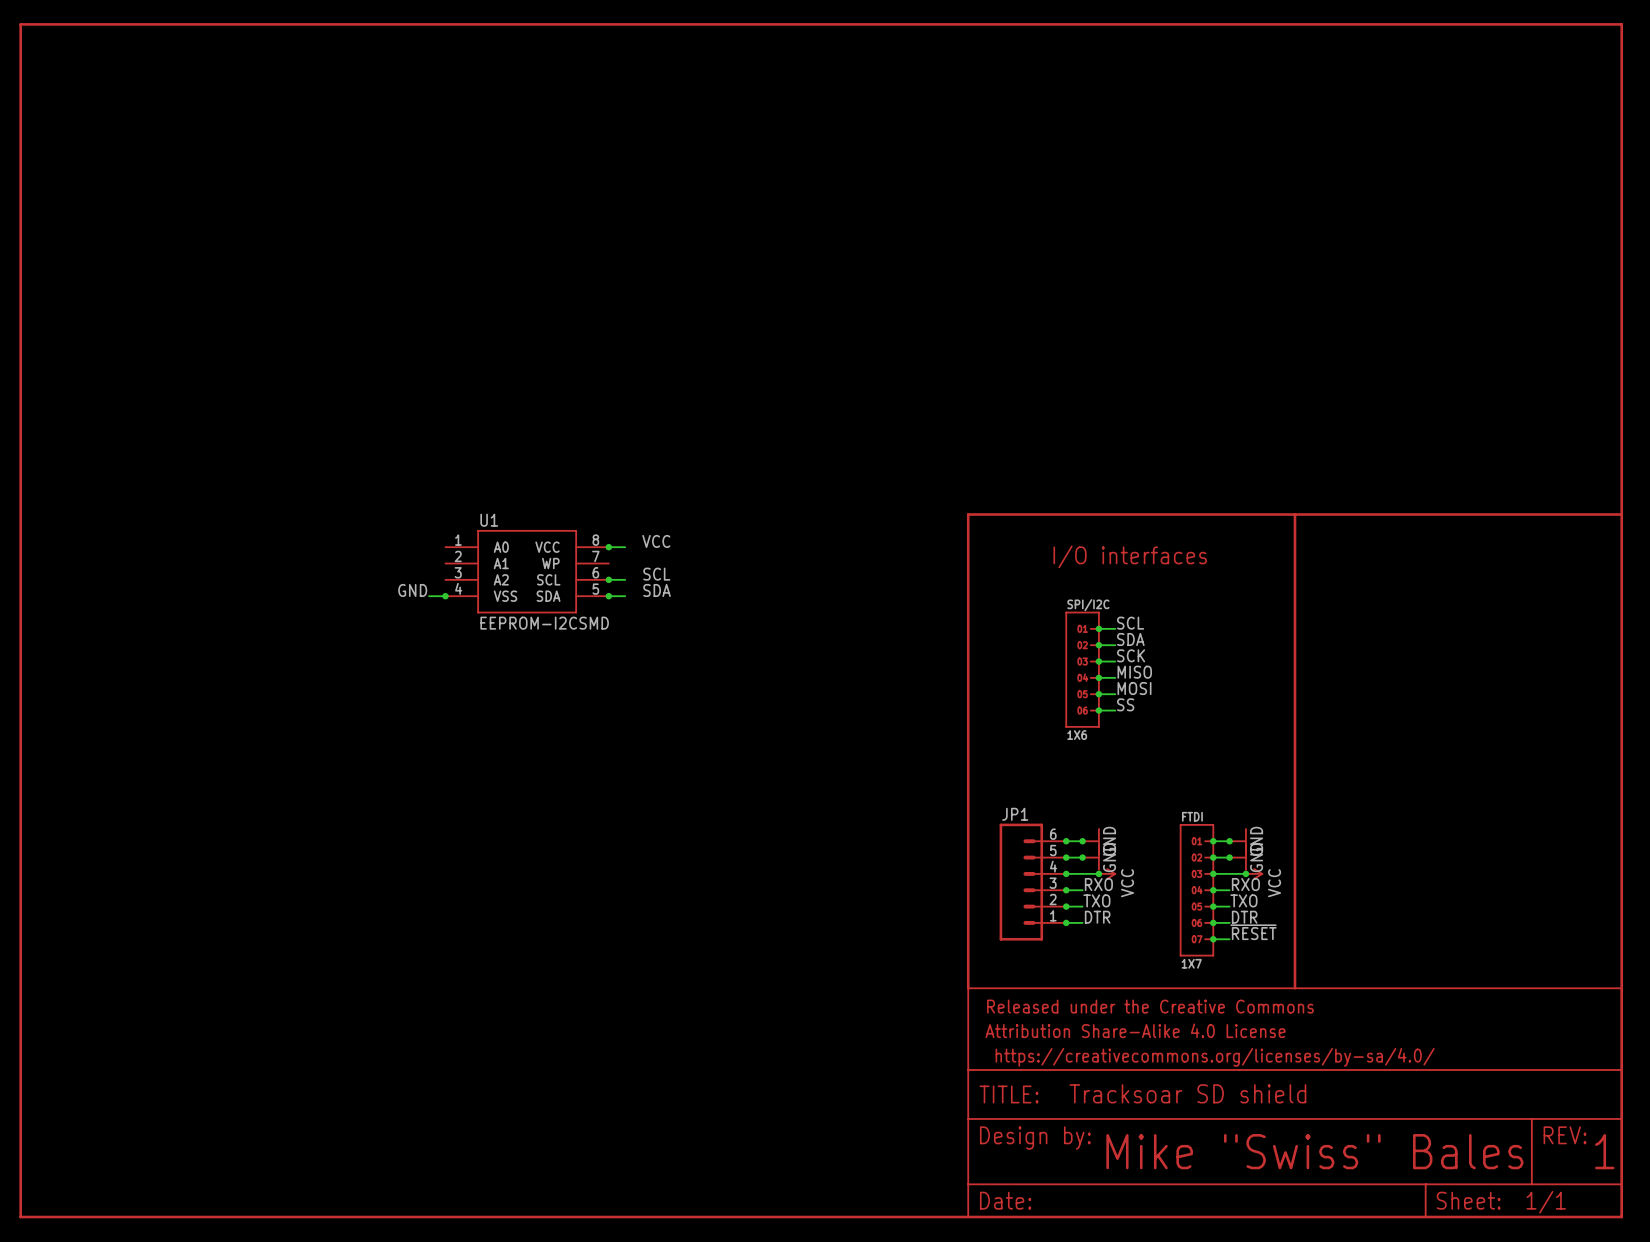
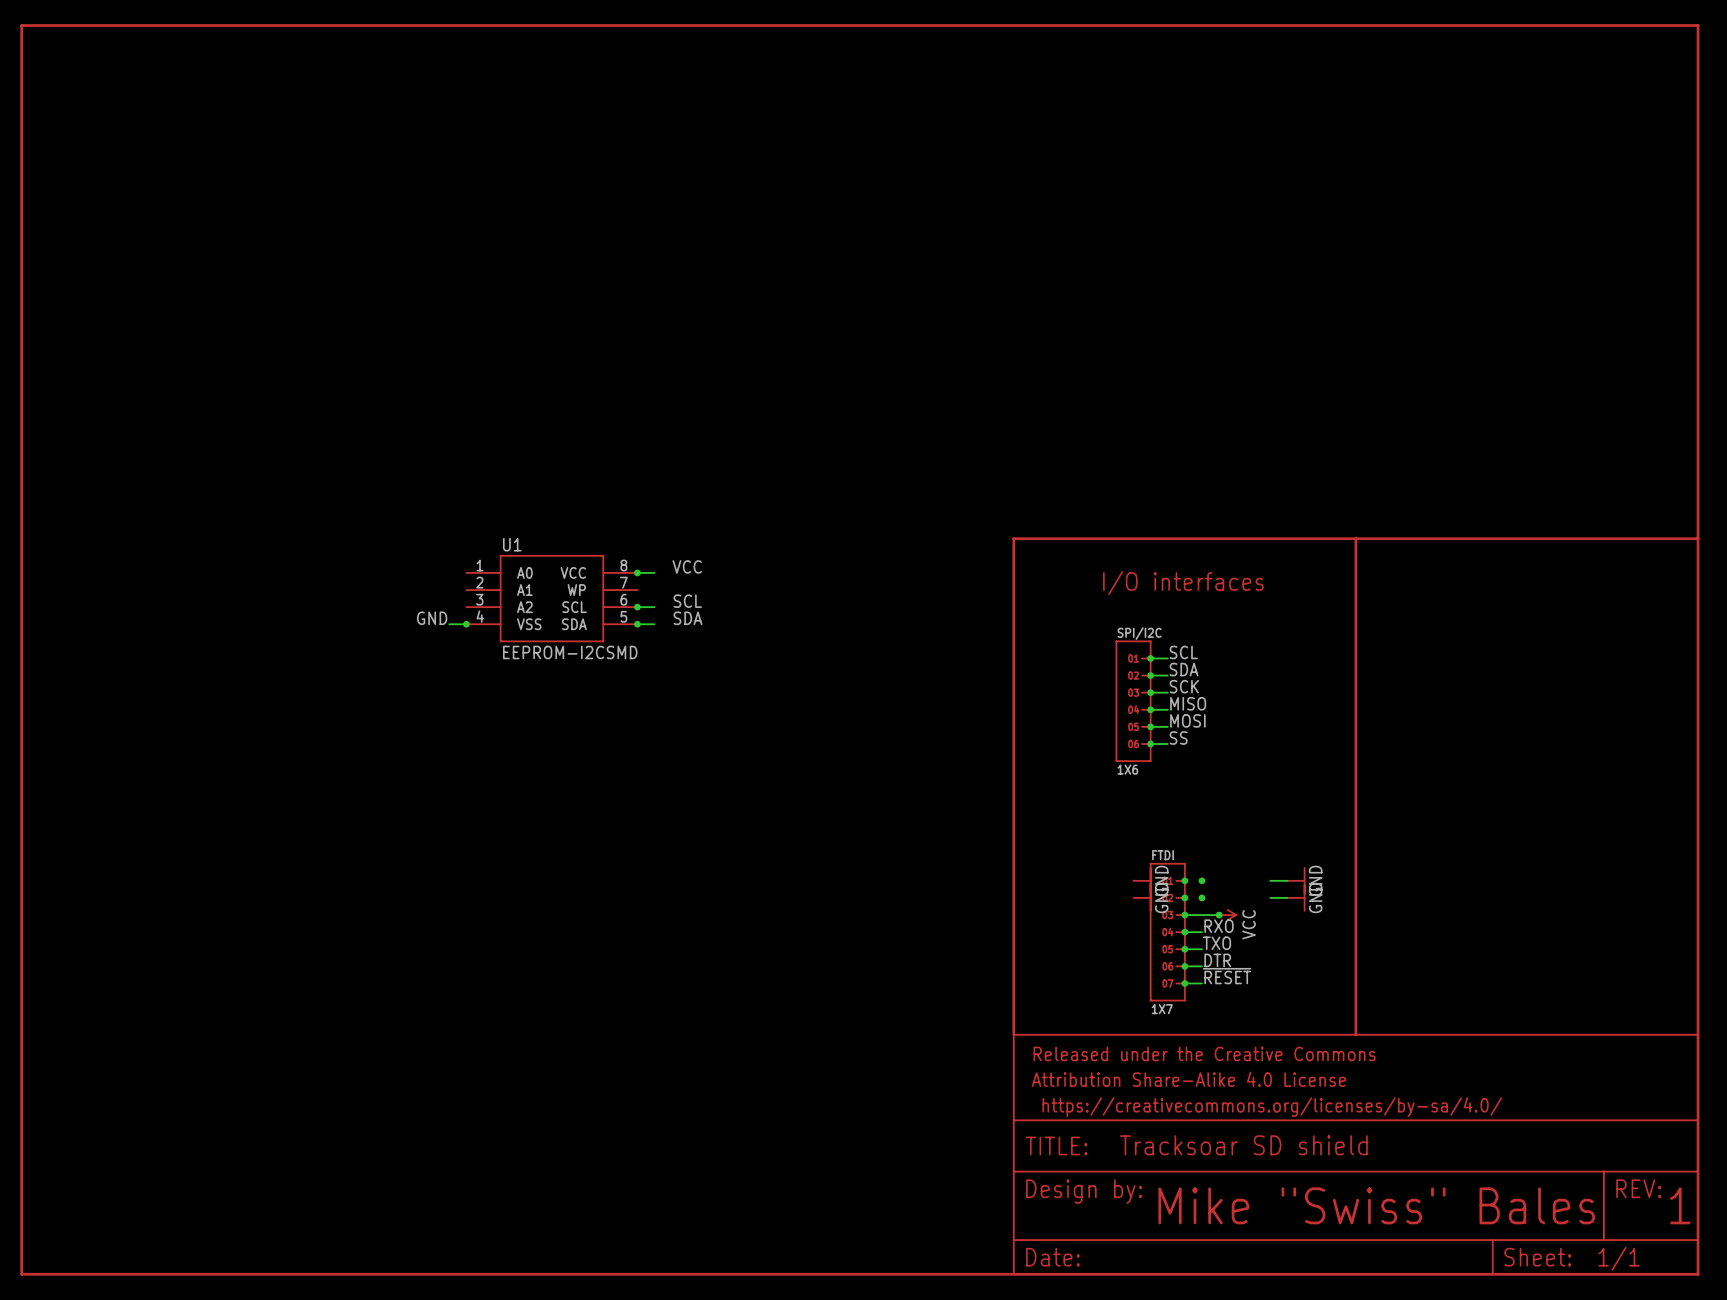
wire: (1066, 841) (1082, 841) -> none
junction: (1066, 841) -> none
junction: (1082, 841) -> none
junction: none -> (1184, 880)
junction: none -> (1201, 880)
junction: (1213, 841) -> none
junction: (1229, 841) -> none
wire: (1066, 857) (1082, 857) -> none
junction: (1066, 857) -> none
junction: (1082, 857) -> none
junction: none -> (1184, 897)
junction: none -> (1201, 897)
junction: (1213, 857) -> none
junction: (1229, 857) -> none
wire: (1066, 873) (1098, 873) -> none
junction: (1066, 873) -> none
junction: (1098, 873) -> none
power symbol: VCC (1107, 873) -> none
junction: none -> (1184, 915)
junction: none -> (1219, 915)
power symbol: none -> VCC (1228, 915)
wire: (1213, 873) (1245, 873) -> (1184, 915) (1219, 915)
junction: (1213, 873) -> none
junction: (1245, 873) -> none
power symbol: VCC (1254, 873) -> none
JP1: (1032, 882) -> none
label: RXO (1098, 884) -> none
label: none -> RXO (1219, 926)
label: RXO (1245, 884) -> none
wire: (1066, 890) (1082, 890) -> none
junction: (1066, 890) -> none
junction: none -> (1184, 932)
FTDI position: (1196, 890) -> (1167, 932)
wire: (1213, 890) (1229, 890) -> (1184, 932) (1201, 932)
junction: (1213, 890) -> none
label: TXO (1096, 900) -> none
label: none -> TXO (1216, 943)
label: TXO (1243, 900) -> none
wire: (1066, 906) (1082, 906) -> none
junction: (1066, 906) -> none
junction: none -> (1184, 949)
wire: (1213, 906) (1229, 906) -> (1184, 949) (1201, 949)
junction: (1213, 906) -> none
label: DTR (1097, 917) -> none
label: none -> DTR (1217, 960)
label: DTR (1244, 917) -> none
wire: (1066, 922) (1082, 922) -> none
junction: (1066, 922) -> none
junction: none -> (1184, 966)
wire: (1213, 922) (1229, 922) -> (1184, 966) (1201, 966)
junction: (1213, 922) -> none
label position: ~{RESET} (1253, 932) -> ~{RESET} (1226, 976)
junction: none -> (1184, 983)
wire: (1213, 939) (1229, 939) -> (1184, 983) (1201, 983)
junction: (1213, 939) -> none

